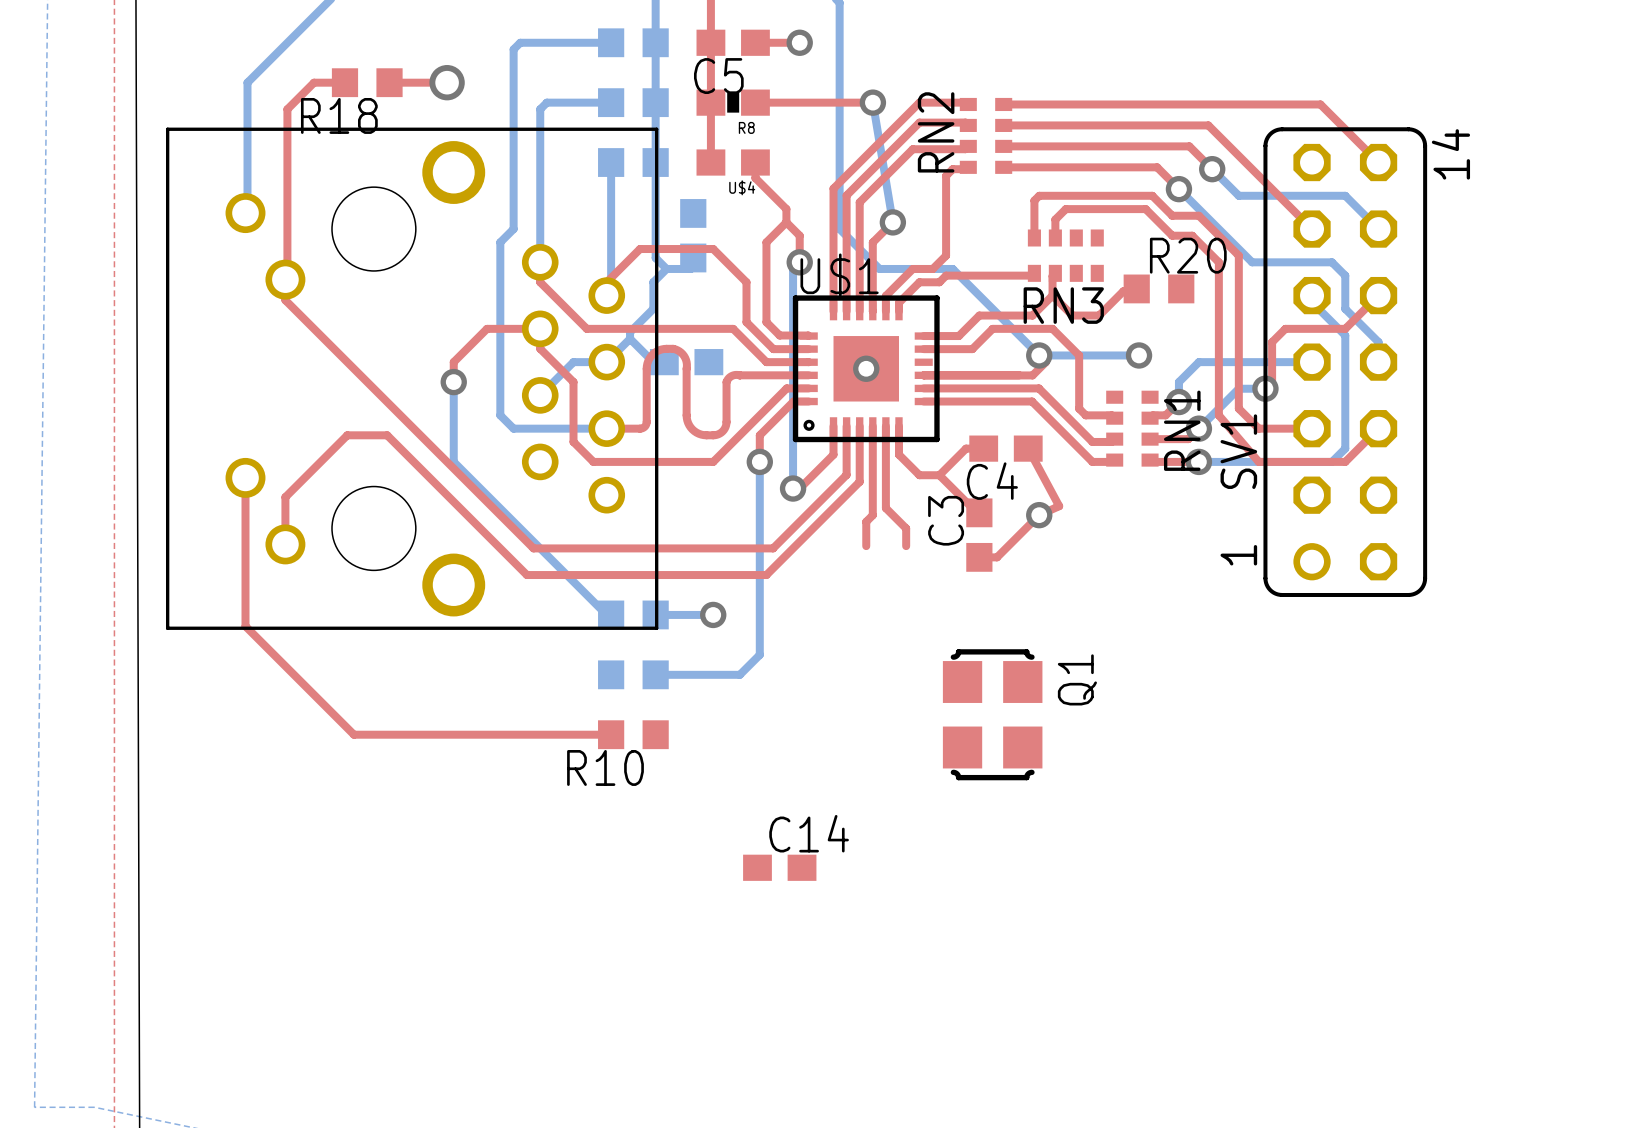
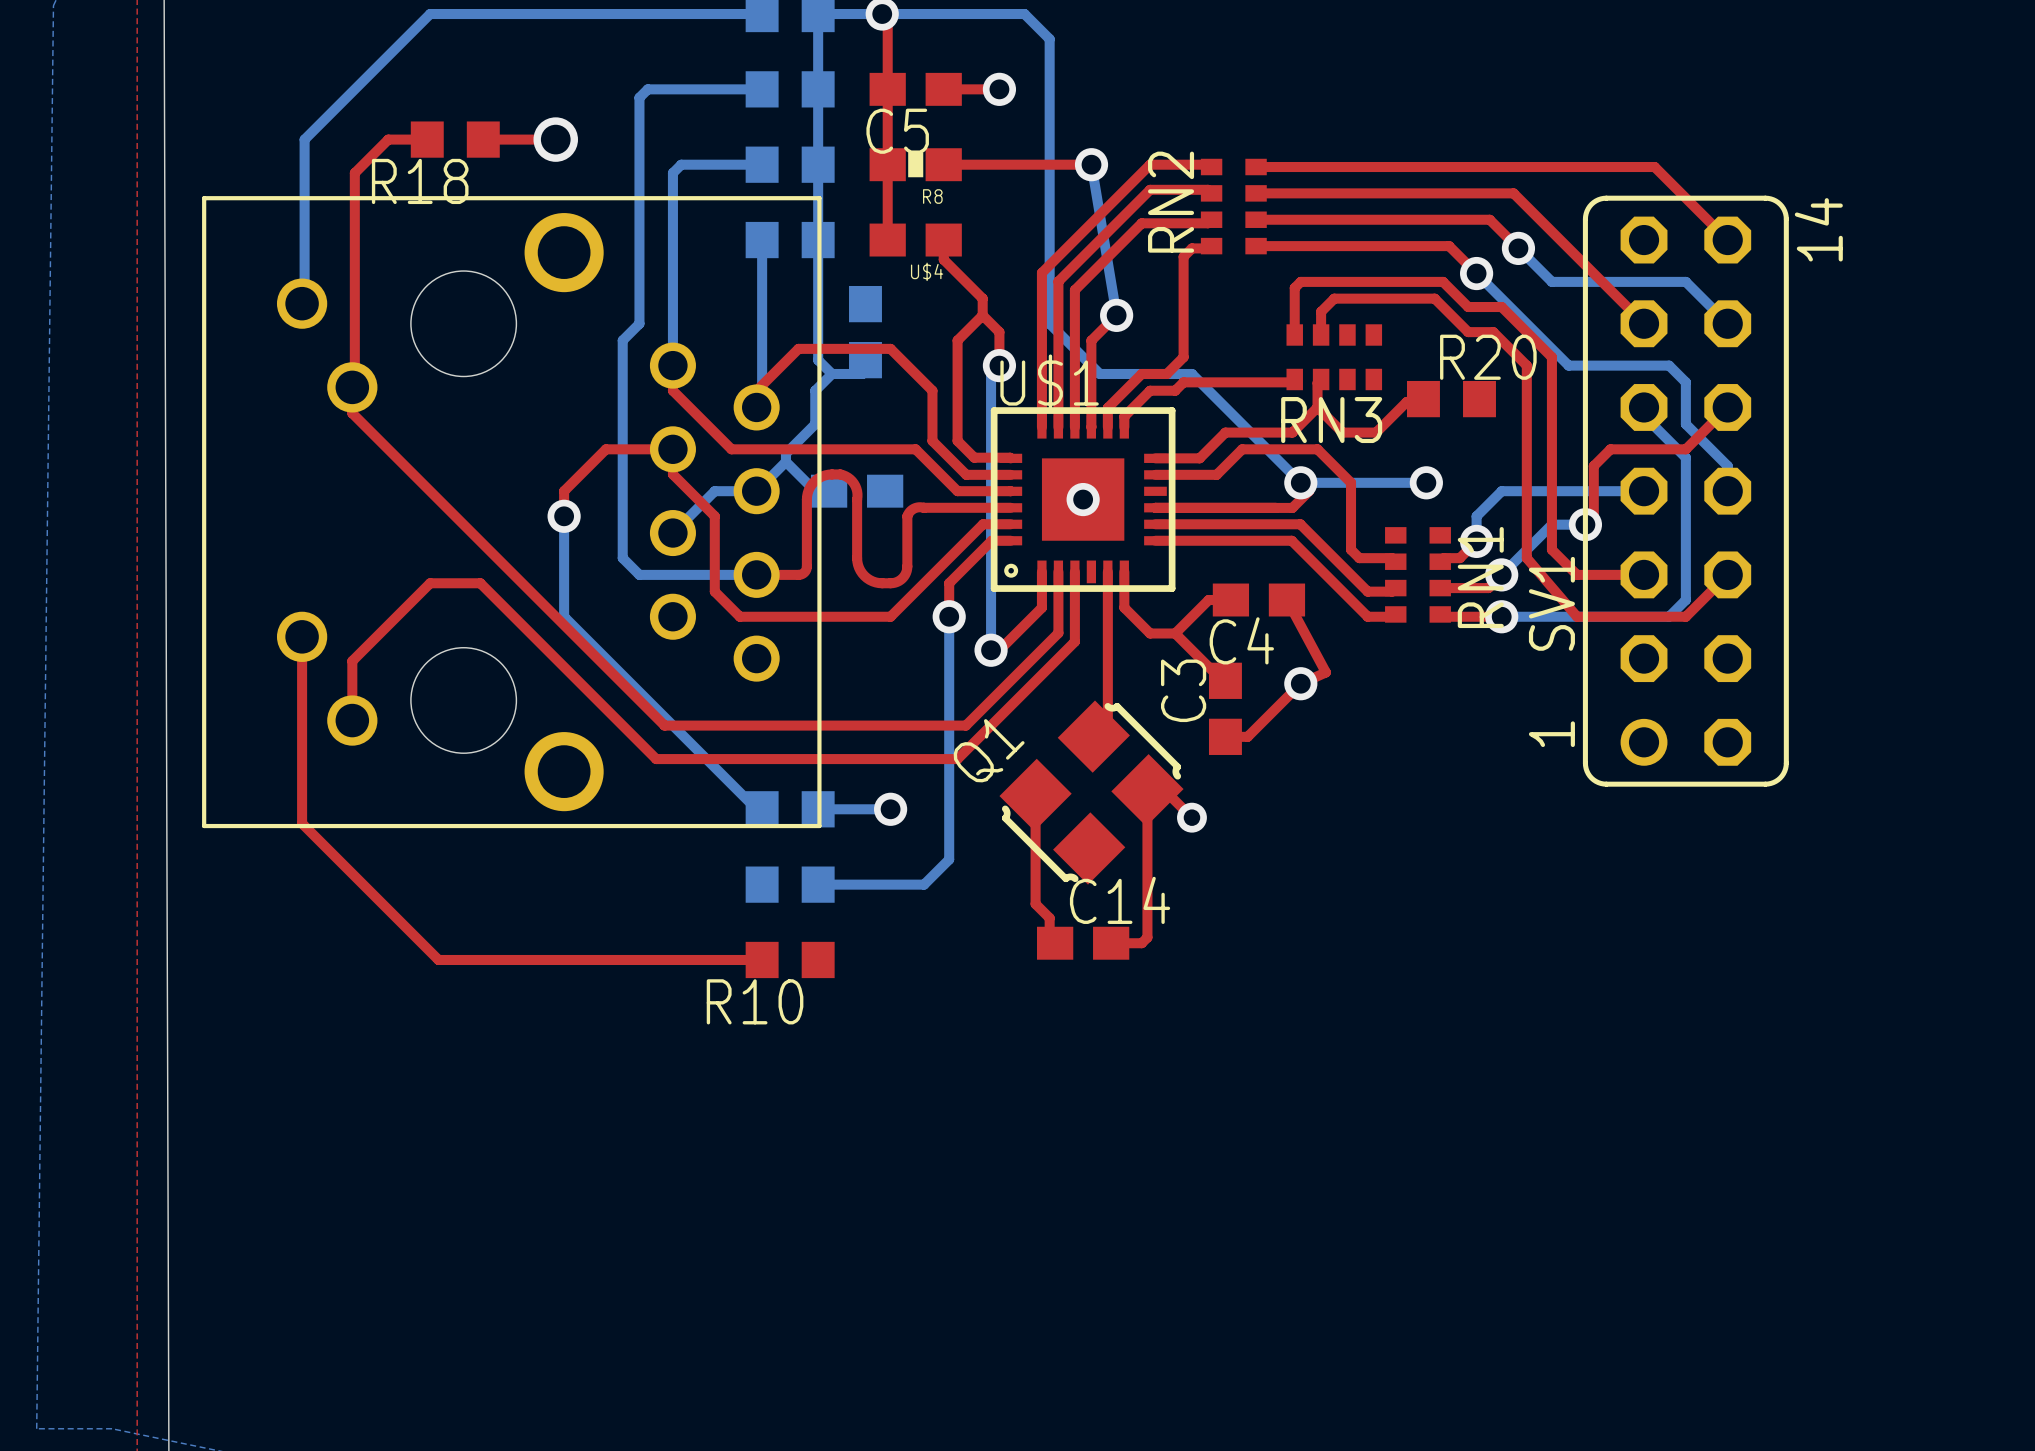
top track: (872, 426) (872, 515) (866, 521) (866, 546) -> none
top track: (885, 508) (906, 528) (906, 546) -> (1107, 674) (1107, 722) (1093, 736)
top track: none -> (1035, 794) (1035, 904) (1049, 918) (1049, 937) (1055, 943)
top track: none -> (1191, 817) (1164, 790) (1147, 790) (1147, 937) (1141, 943) (1111, 943)
via: none -> (1191, 817)
Q1 name position: Q1 (1077, 679) -> Q1 (989, 750)
Q1 rotation: 0° (992, 714) -> 45° clockwise (1091, 792)
Q1 position: (992, 714) -> (1091, 792)
C14 position: (779, 867) -> (1083, 943)

